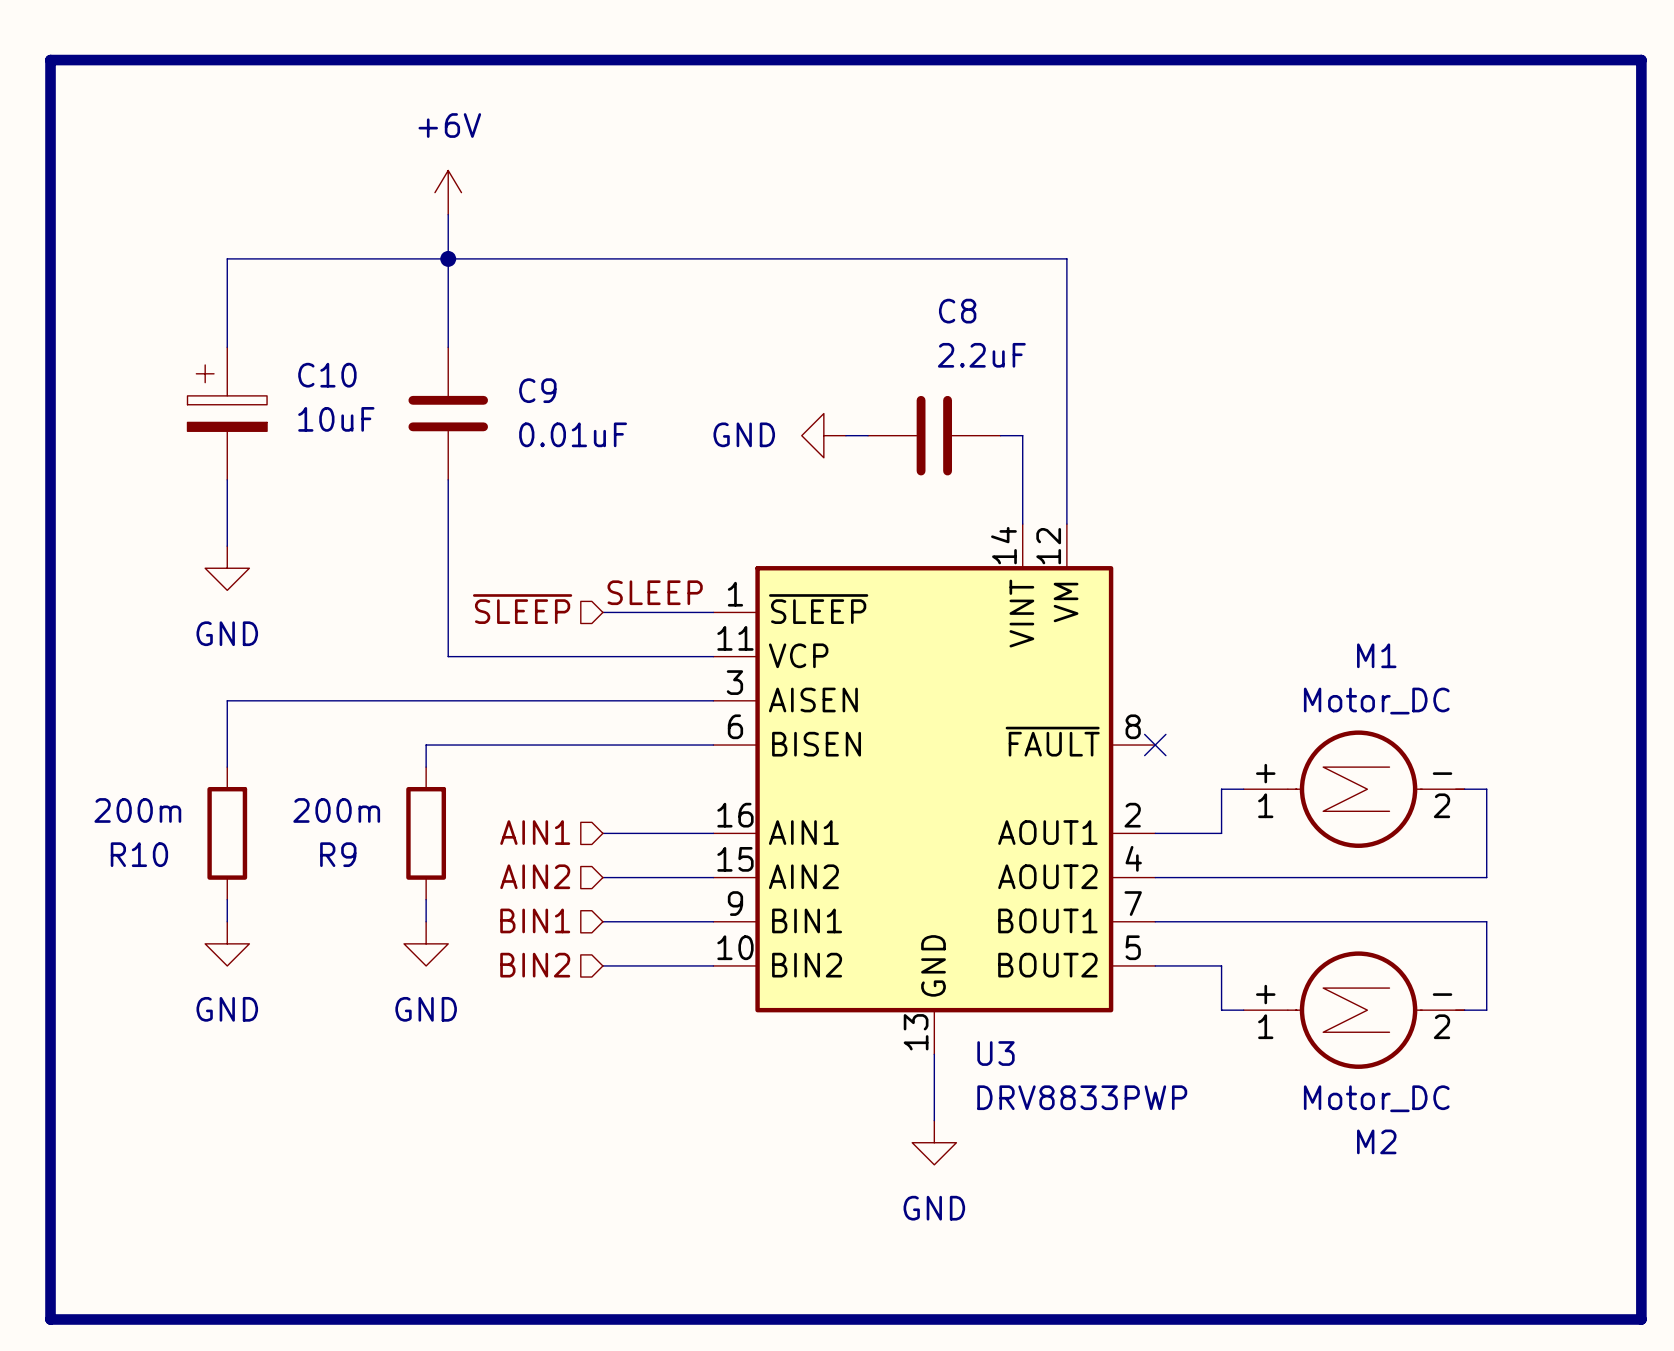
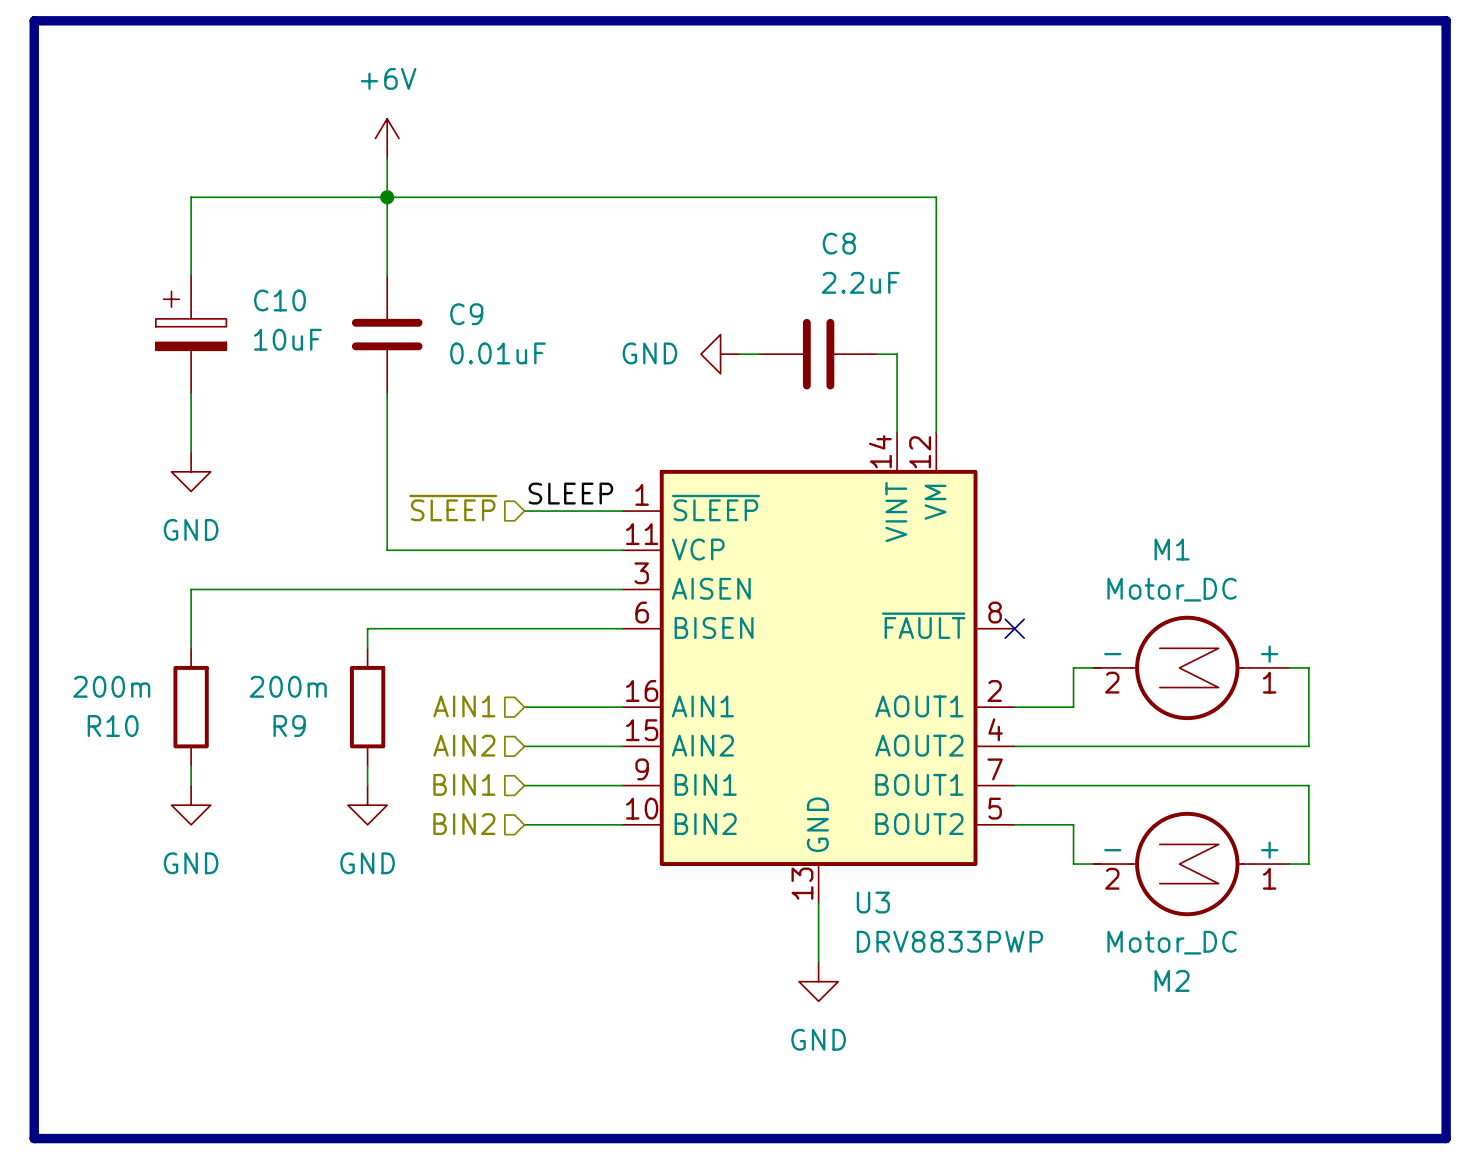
M1 name position: M1 (1376, 655) -> M1 (1172, 549)
M1 value position: Motor_DC (1376, 701) -> Motor_DC (1172, 589)
M1 rotation: 0° (1376, 789) -> 180° (1171, 667)
M2 rotation: 0° (1376, 1010) -> 180° (1171, 864)
M2 value position: Motor_DC (1376, 1098) -> Motor_DC (1172, 942)
M2 name position: M2 (1376, 1141) -> M2 (1172, 980)

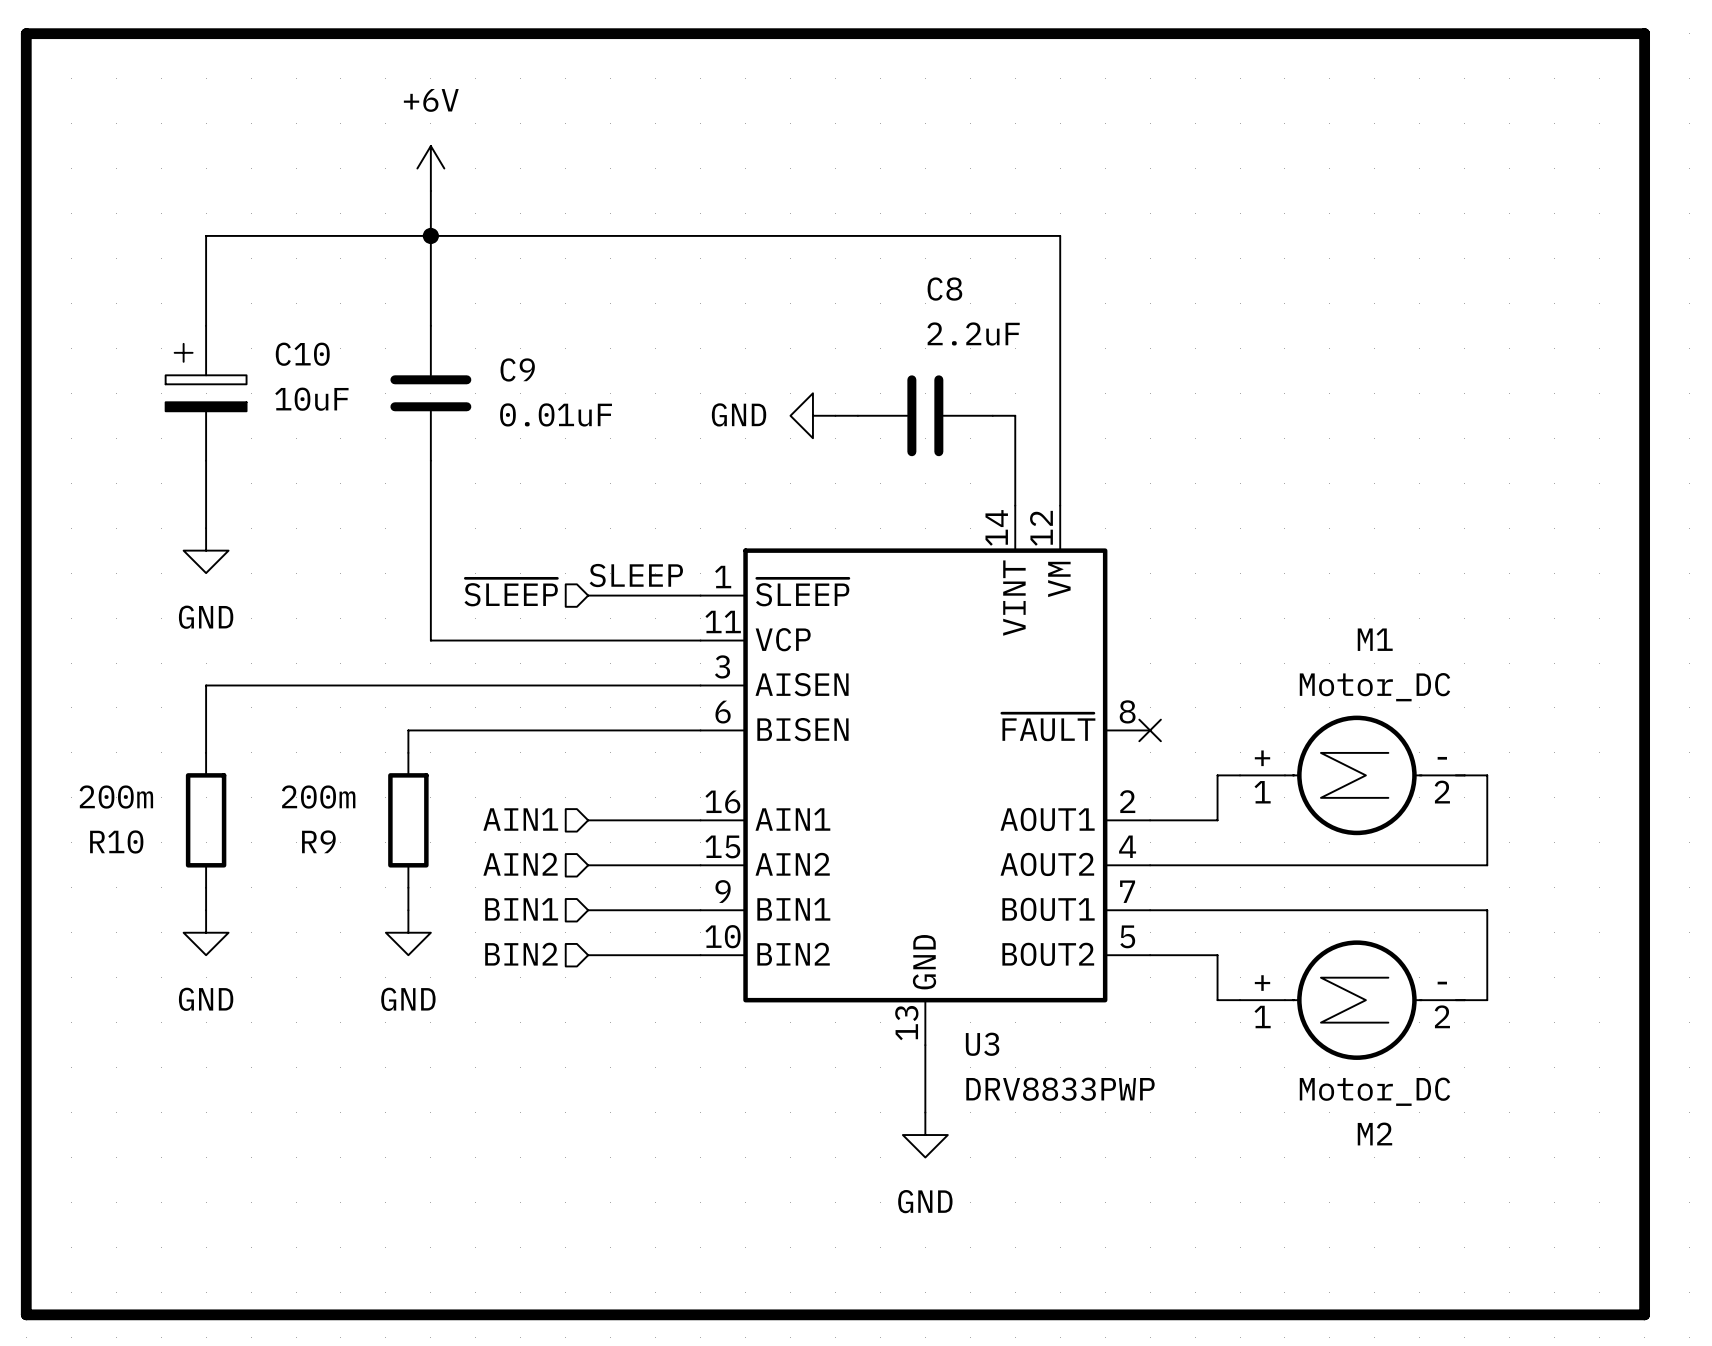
M1 name position: M1 (1172, 549) -> M1 (1375, 639)
M1 value position: Motor_DC (1172, 589) -> Motor_DC (1374, 687)
M1 rotation: 0° (1171, 667) -> 180° (1374, 775)
M2 rotation: 0° (1171, 864) -> 180° (1374, 1000)
M2 value position: Motor_DC (1172, 942) -> Motor_DC (1374, 1091)
M2 name position: M2 (1172, 980) -> M2 (1374, 1133)

